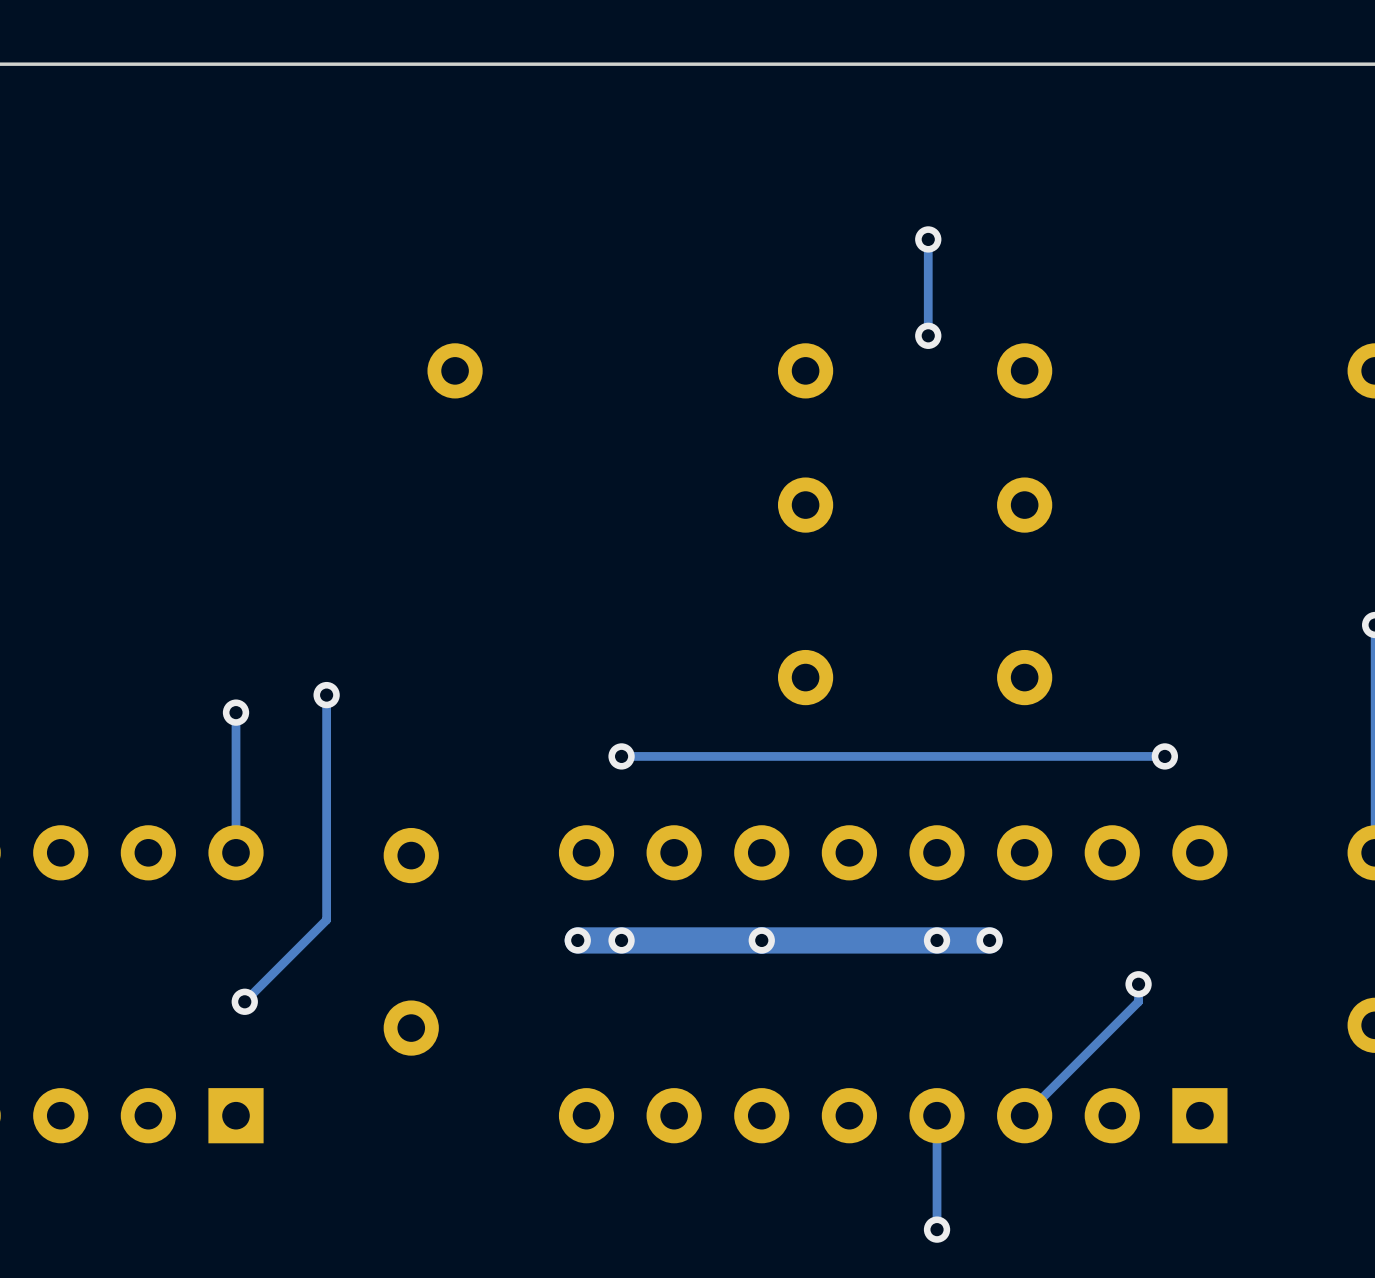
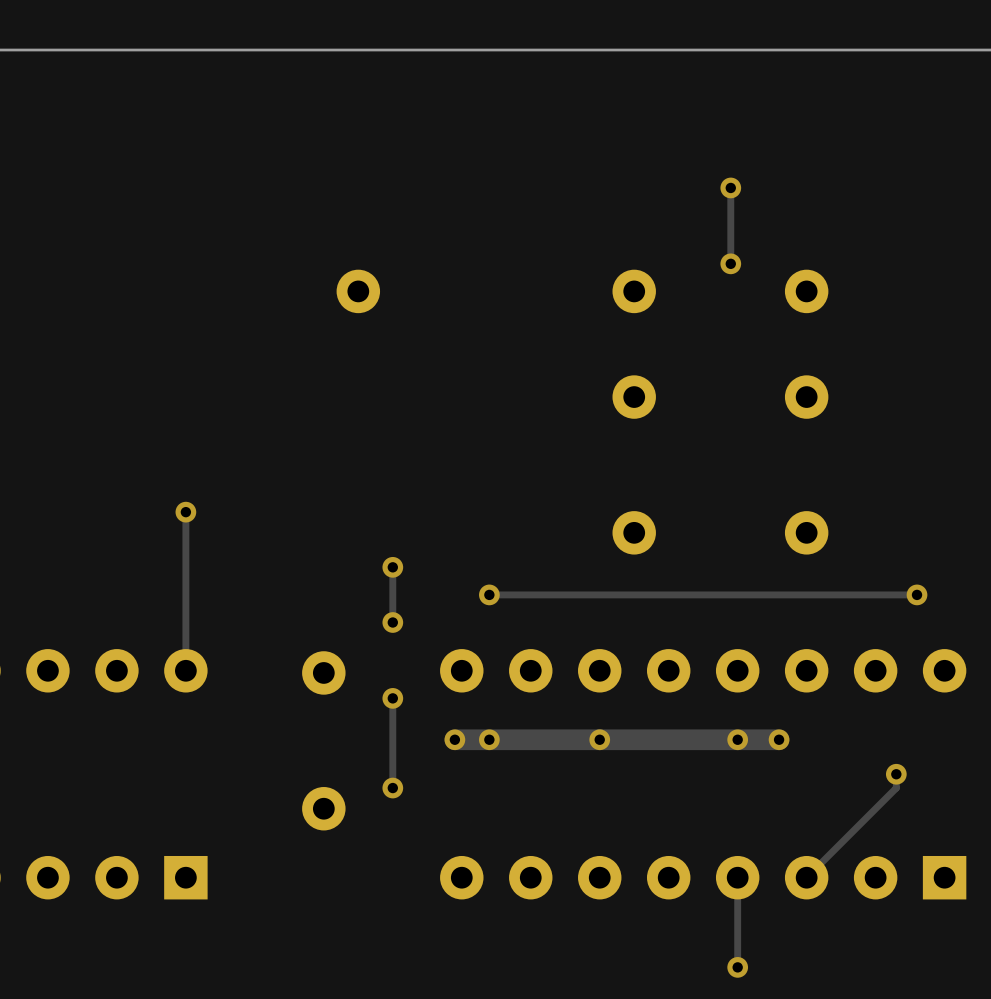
track: none -> (185, 512) (185, 560)
via: none -> (185, 512)
track: (326, 695) (326, 919) (244, 1001) -> none
via: (326, 695) -> none
via: (236, 712) -> none
track: none -> (392, 567) (392, 622)
via: none -> (392, 567)
via: none -> (392, 622)
track: none -> (392, 698) (392, 788)
via: none -> (392, 698)
via: (244, 1001) -> none
via: none -> (392, 788)

